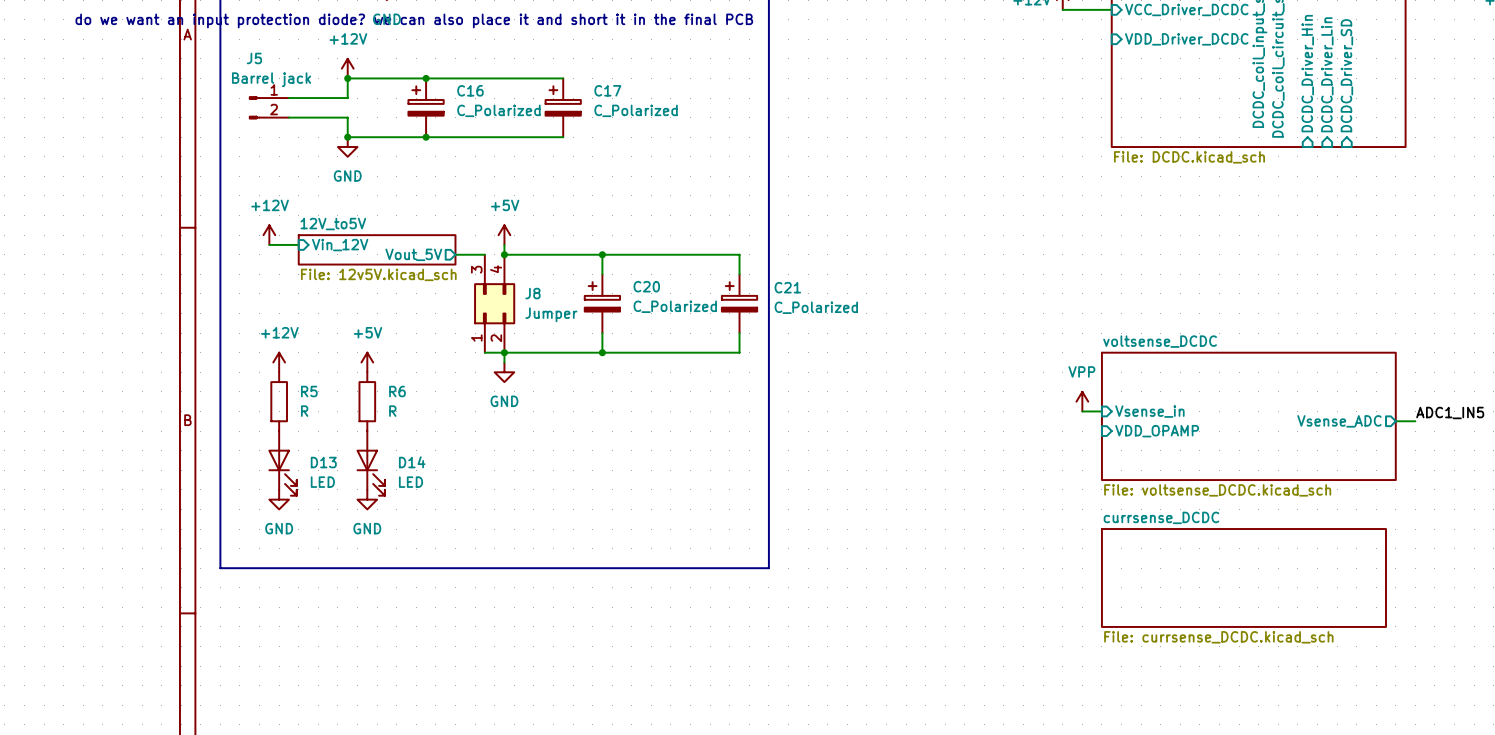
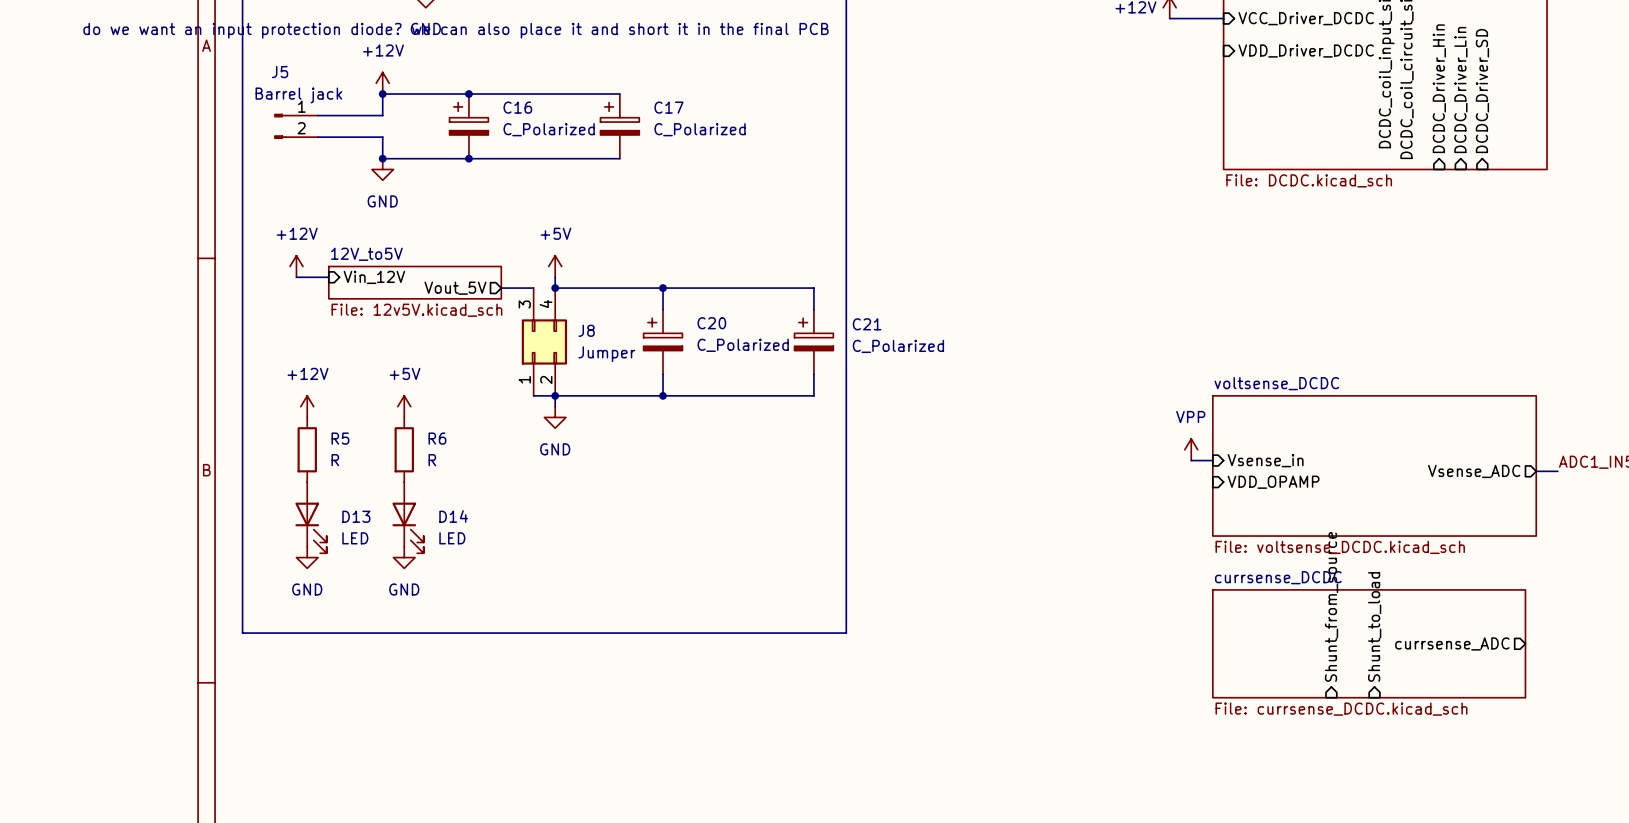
sheet pin: none -> Shunt_from_source (1331, 606)
sheet pin: none -> Shunt_to_load (1374, 626)
sheet pin: none -> currsense_ADC (1452, 643)

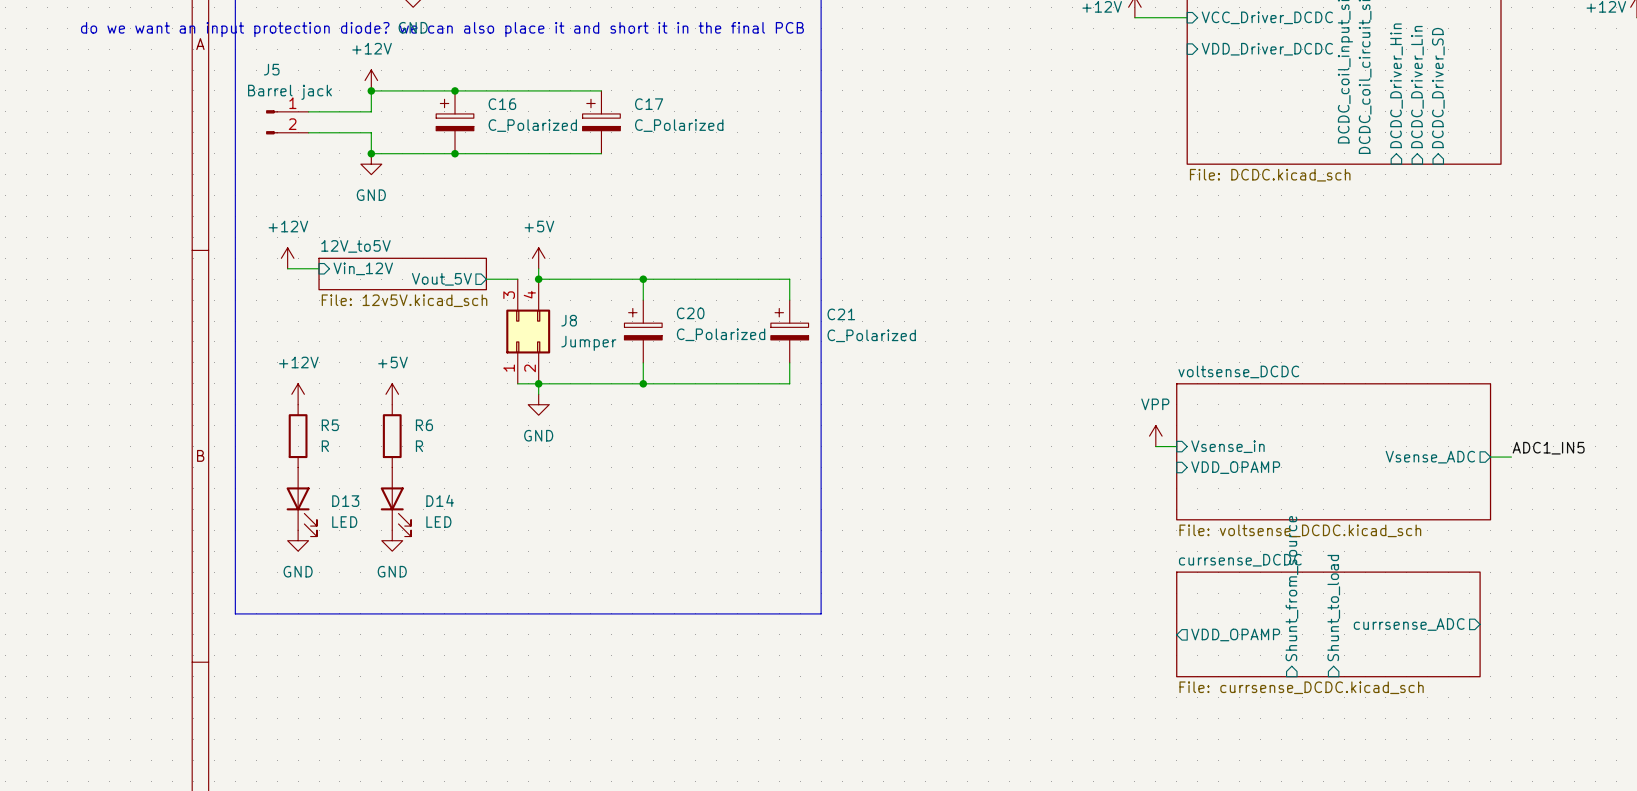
sheet pin: none -> VDD_OPAMP (1235, 634)

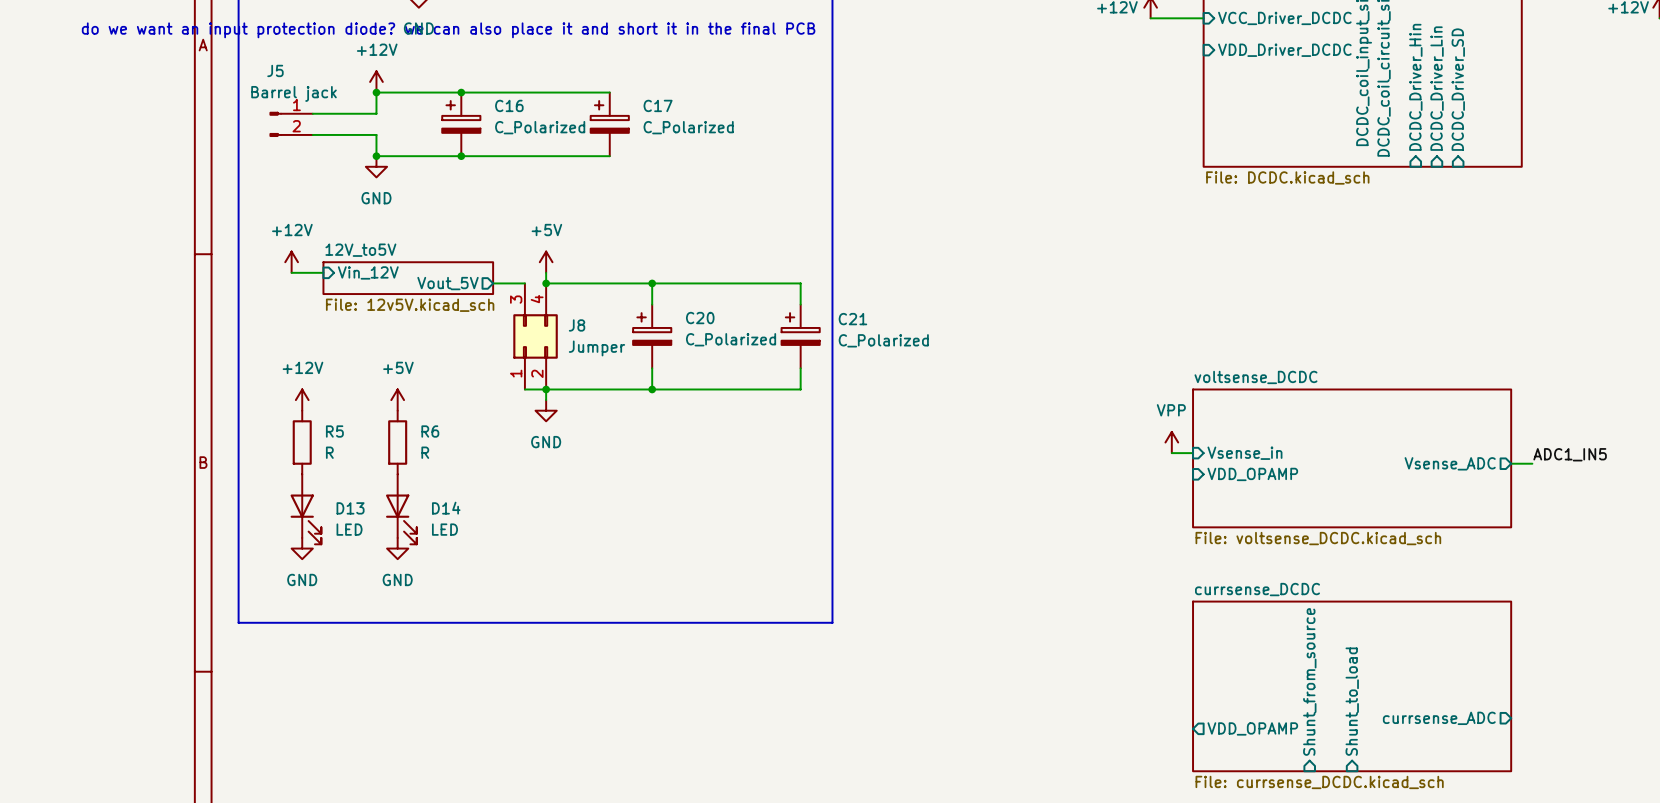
sheet pin position: Shunt_from_source (1291, 588) -> Shunt_from_source (1309, 681)
sheet pin position: Shunt_to_load (1333, 608) -> Shunt_to_load (1352, 701)
sheet currsense_DCDC: File: currsense_DCDC.kicad_sch (1328, 624) -> none
sheet pin position: currsense_ADC (1409, 624) -> currsense_ADC (1439, 718)
sheet pin position: VDD_OPAMP (1235, 634) -> VDD_OPAMP (1252, 728)
sheet currsense_DCDC: none -> File: currsense_DCDC.kicad_sch (1352, 686)

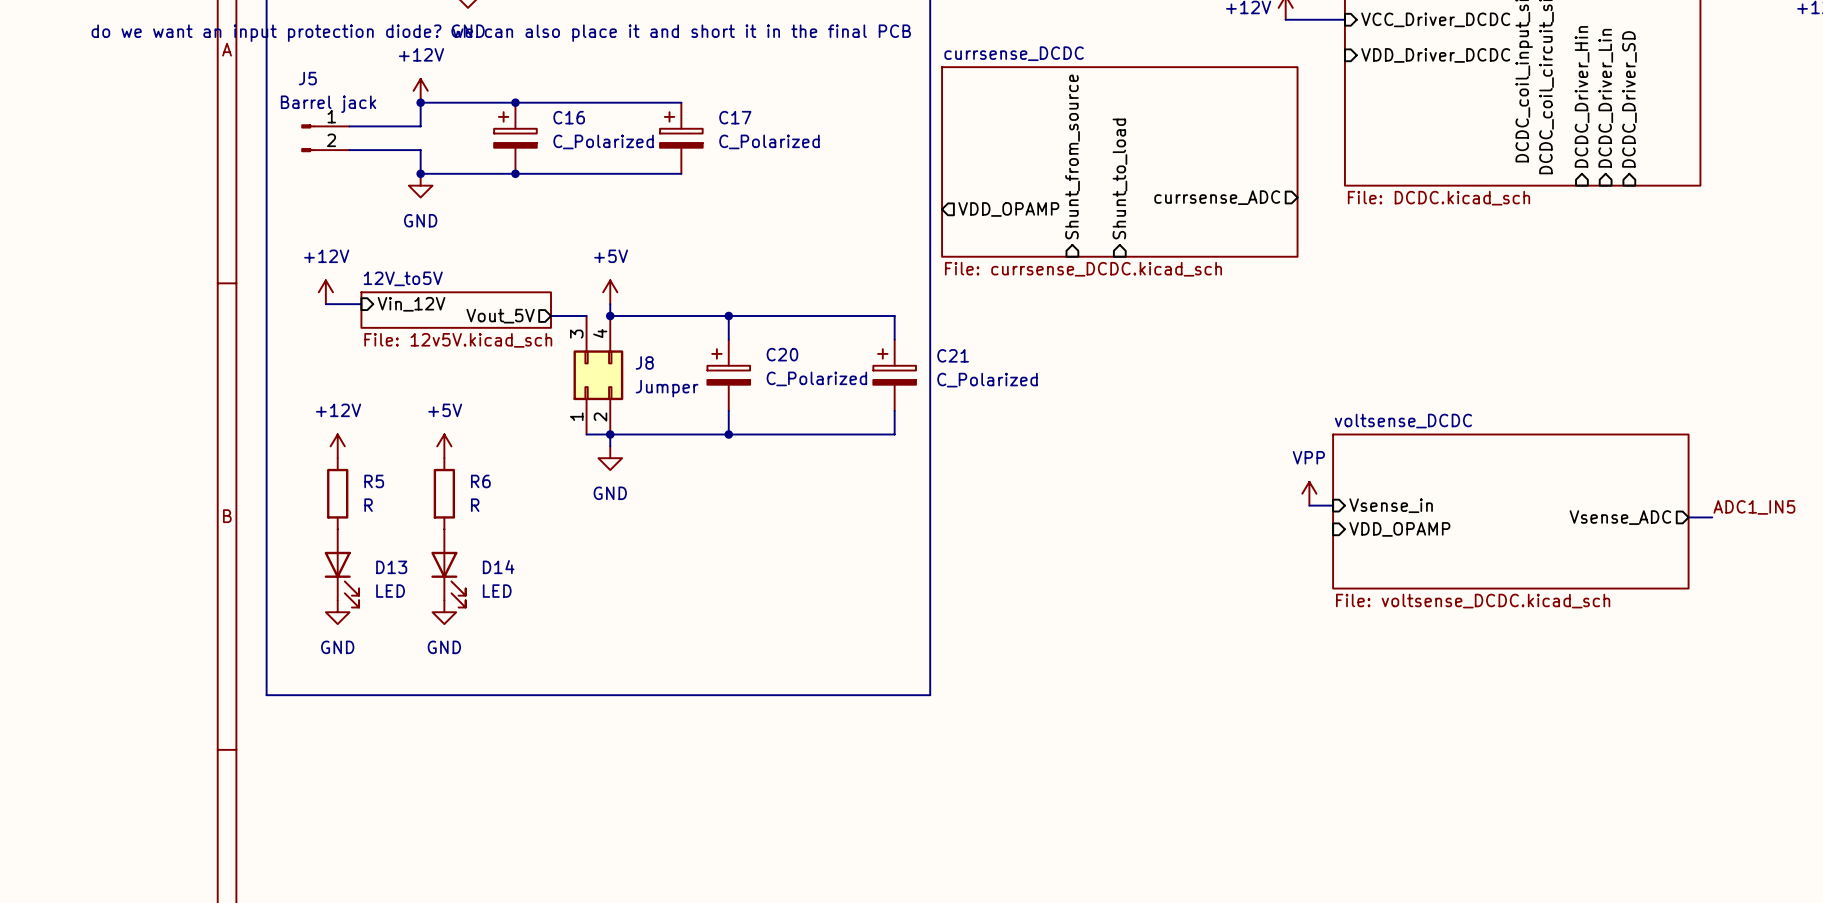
sheet pin: none -> Shunt_from_source (1072, 156)
sheet currsense_DCDC: none -> File: currsense_DCDC.kicad_sch (1119, 161)
sheet pin: none -> Shunt_to_load (1119, 178)
sheet pin: none -> currsense_ADC (1217, 197)
sheet pin: none -> VDD_OPAMP (1008, 209)
sheet pin: Shunt_from_source (1309, 681) -> none
sheet currsense_DCDC: File: currsense_DCDC.kicad_sch (1352, 686) -> none
sheet pin: Shunt_to_load (1352, 701) -> none
sheet pin: currsense_ADC (1439, 718) -> none
sheet pin: VDD_OPAMP (1252, 728) -> none

